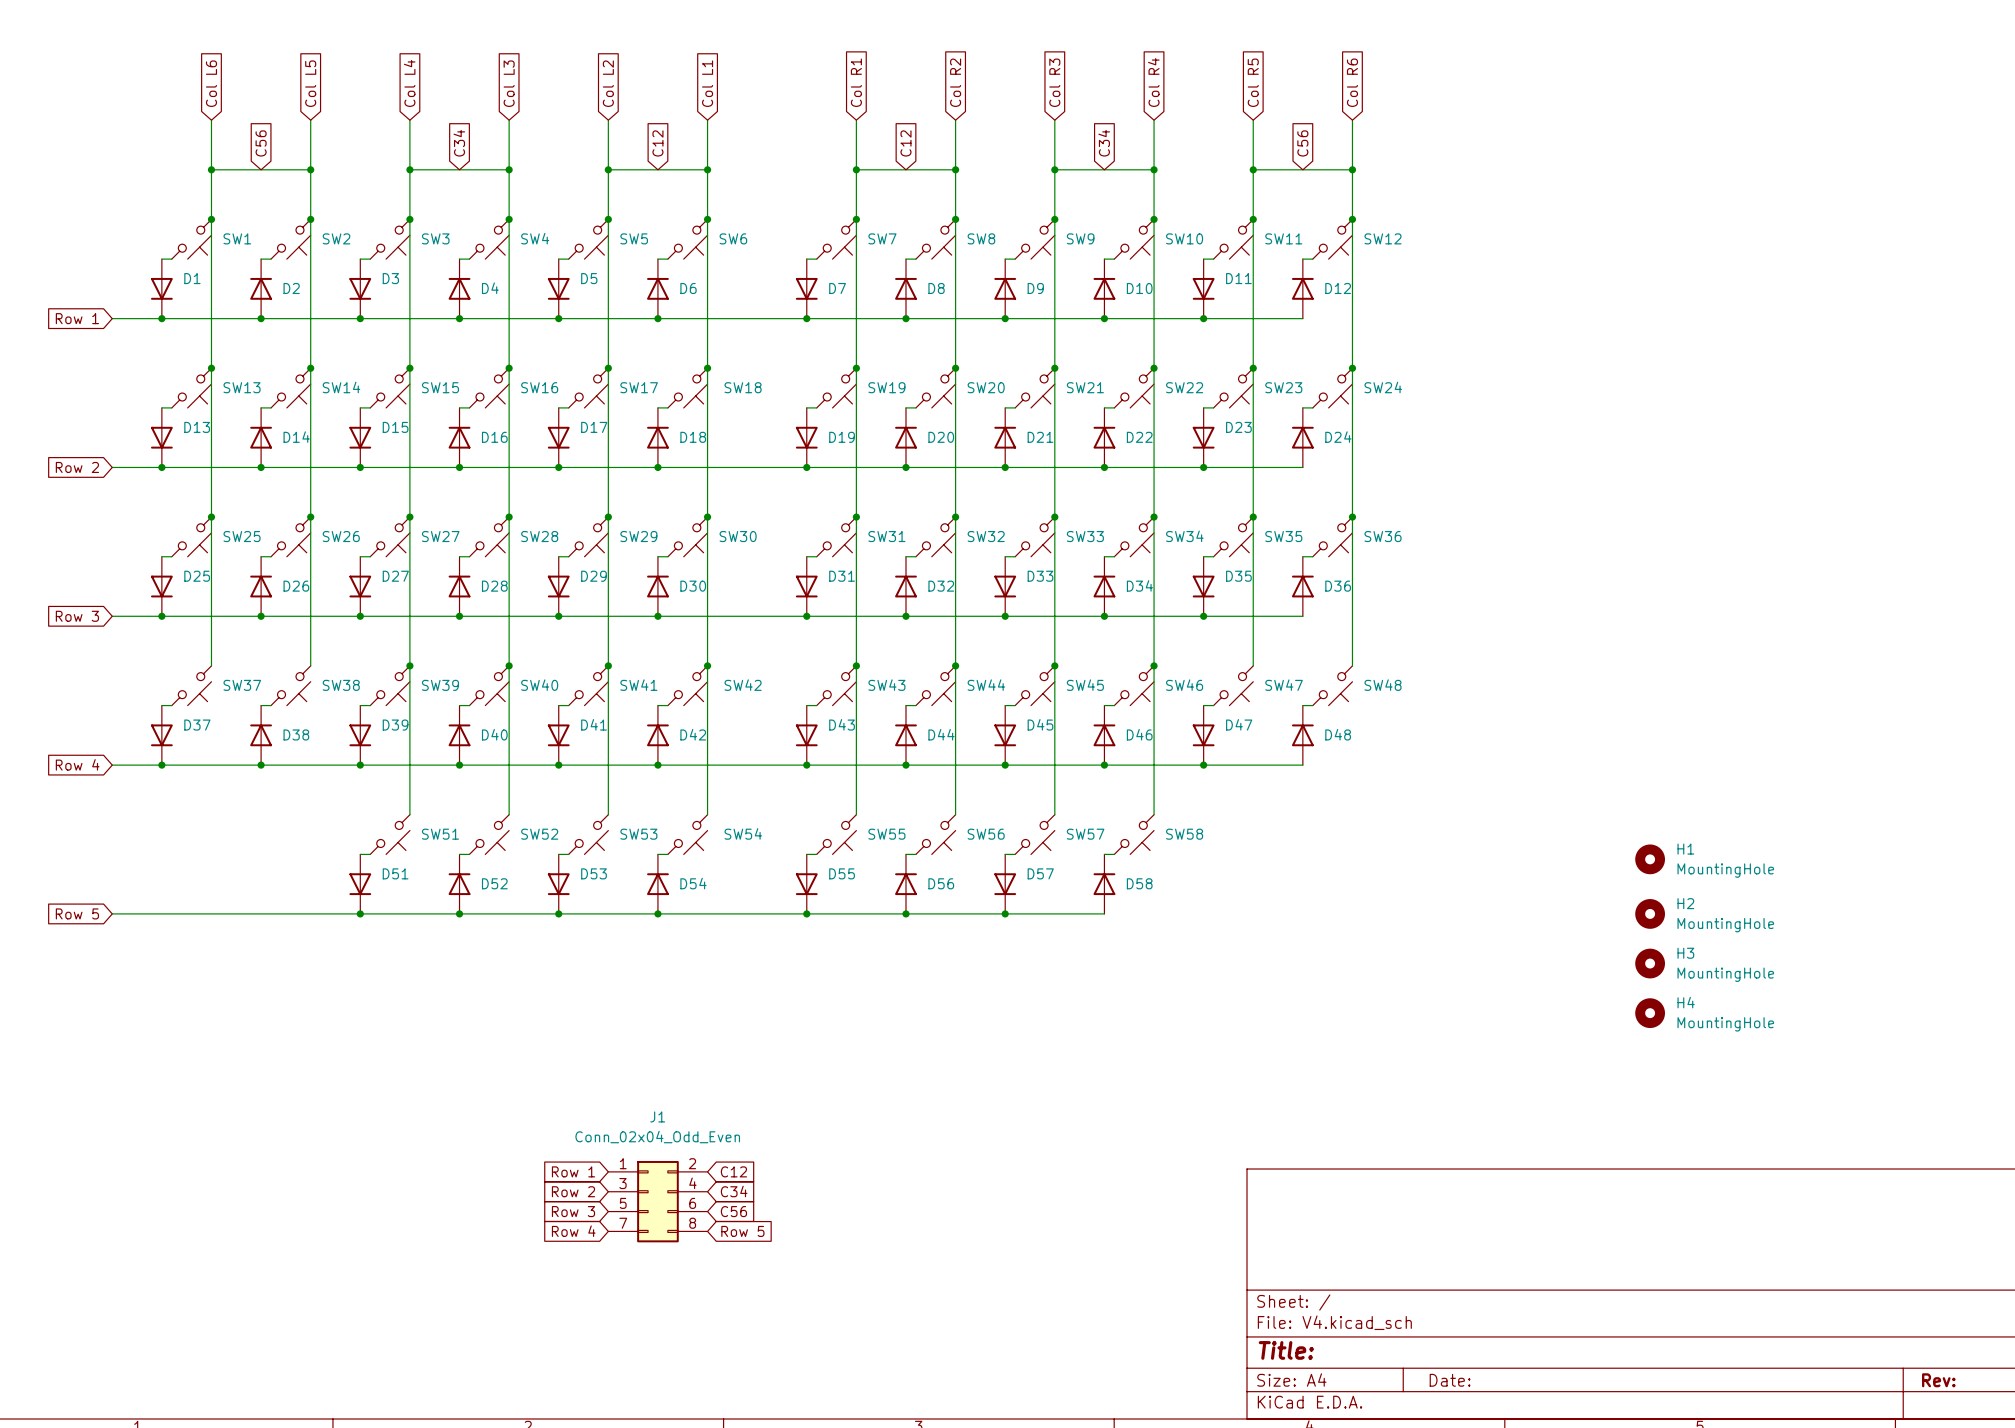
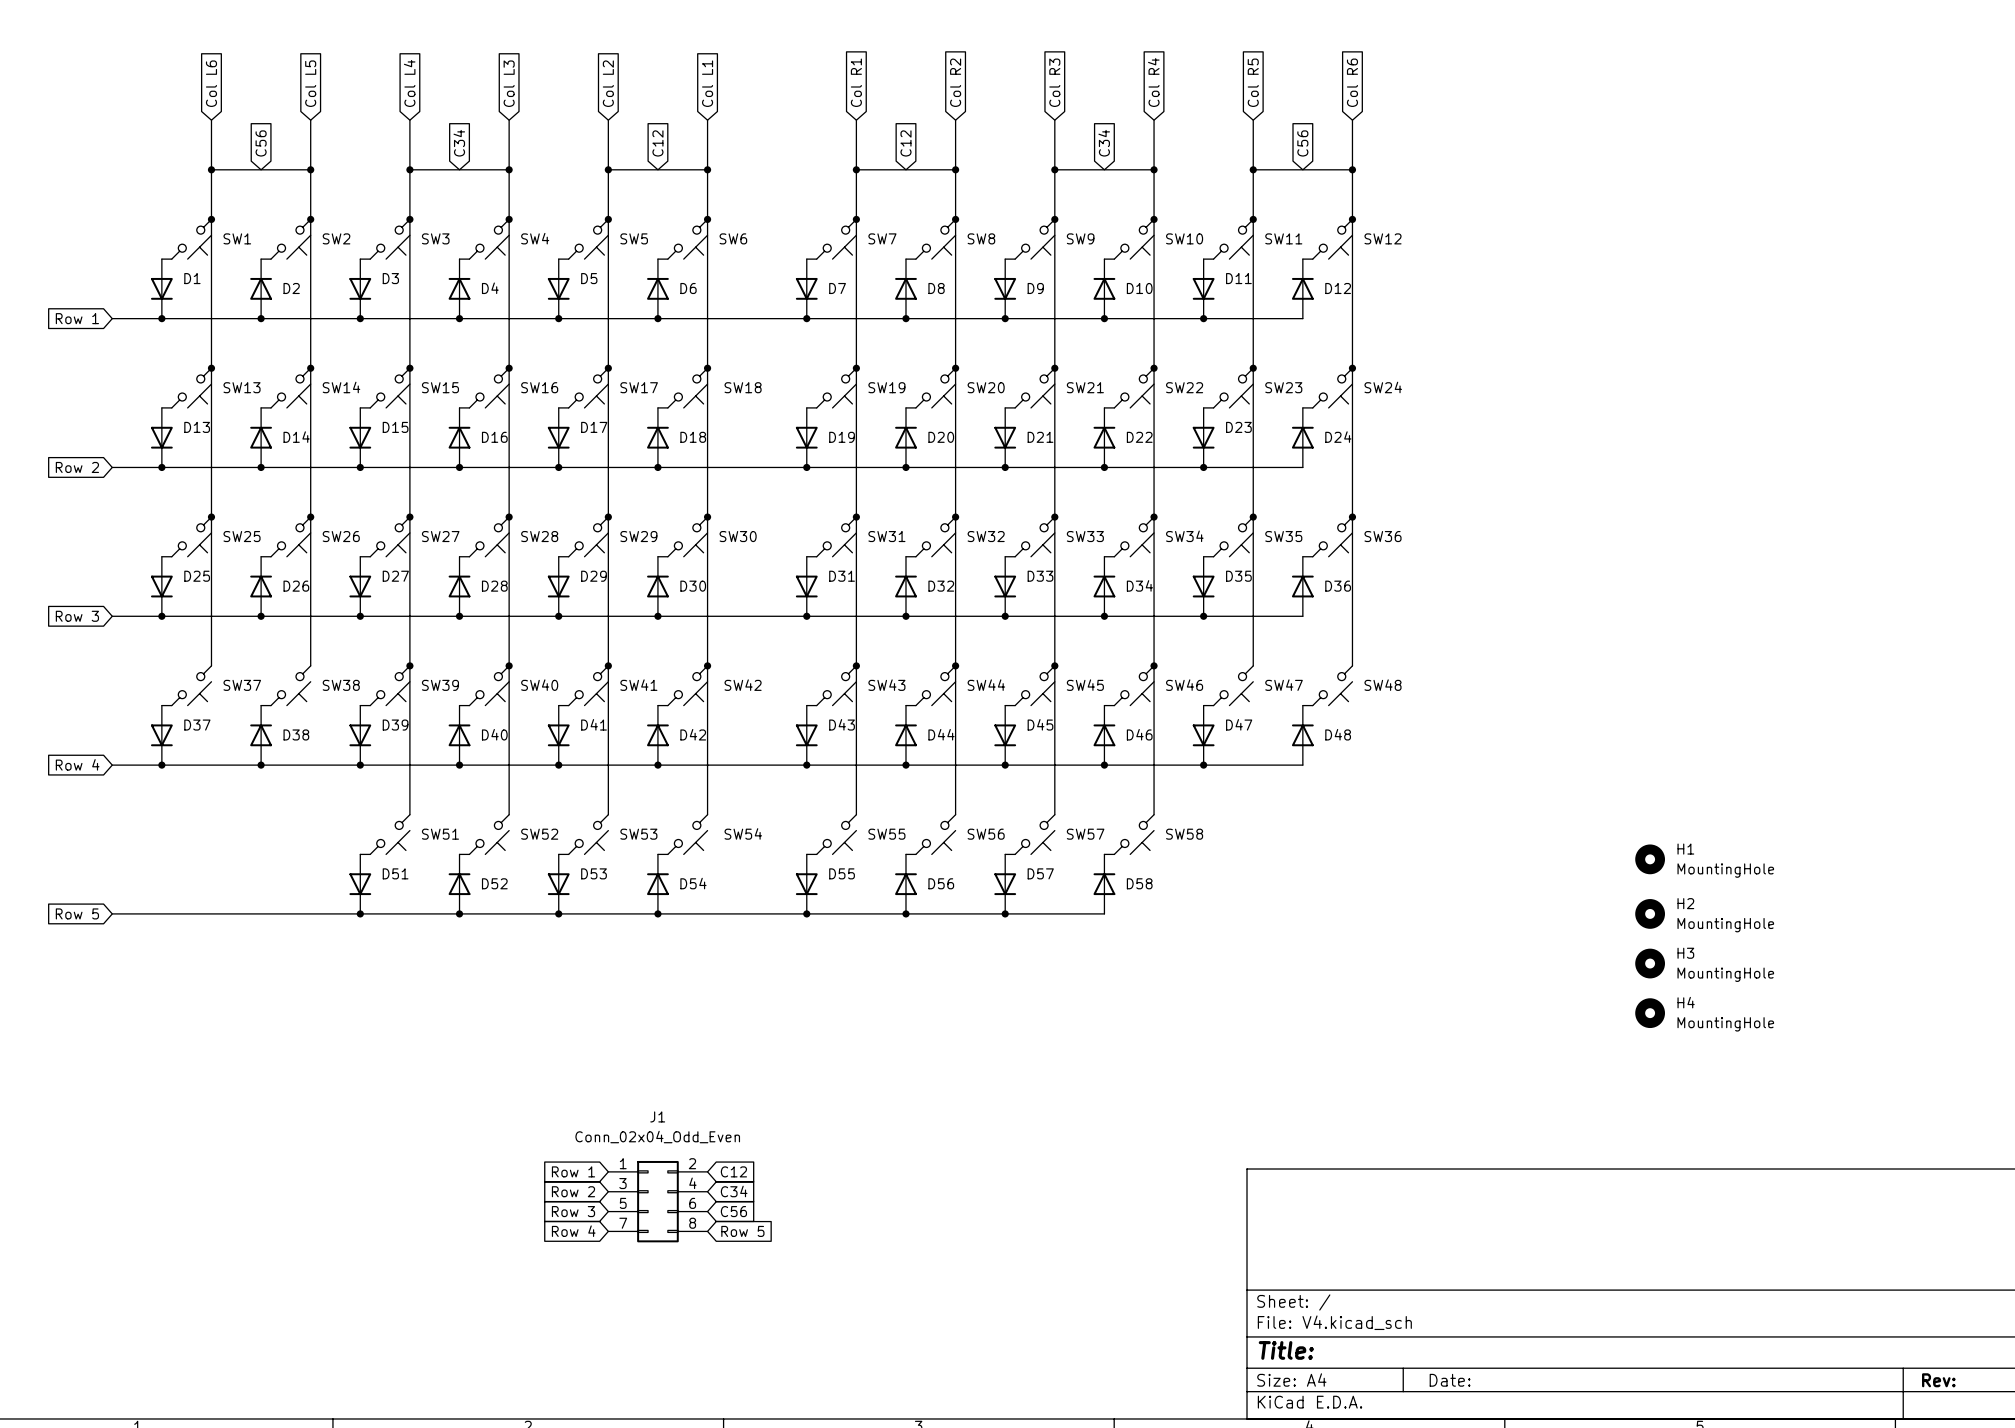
D9 rotation: 0° (1005, 288) -> 180° (1005, 288)
D21 rotation: 0° (1005, 437) -> 180° (1005, 437)

